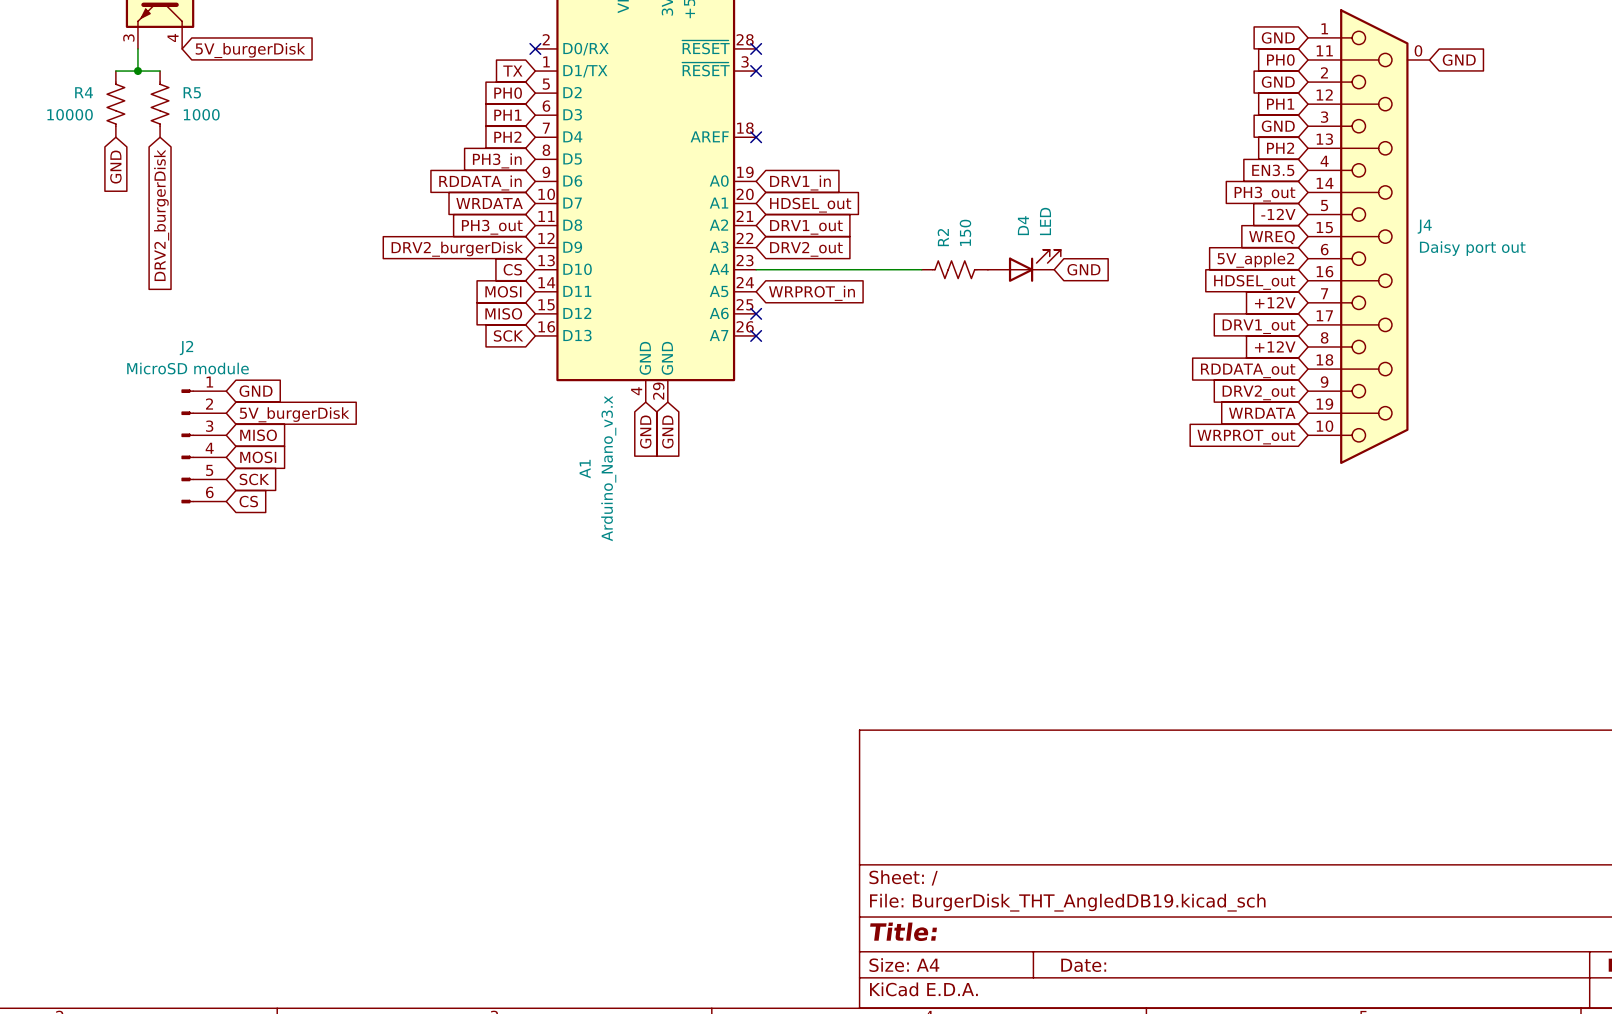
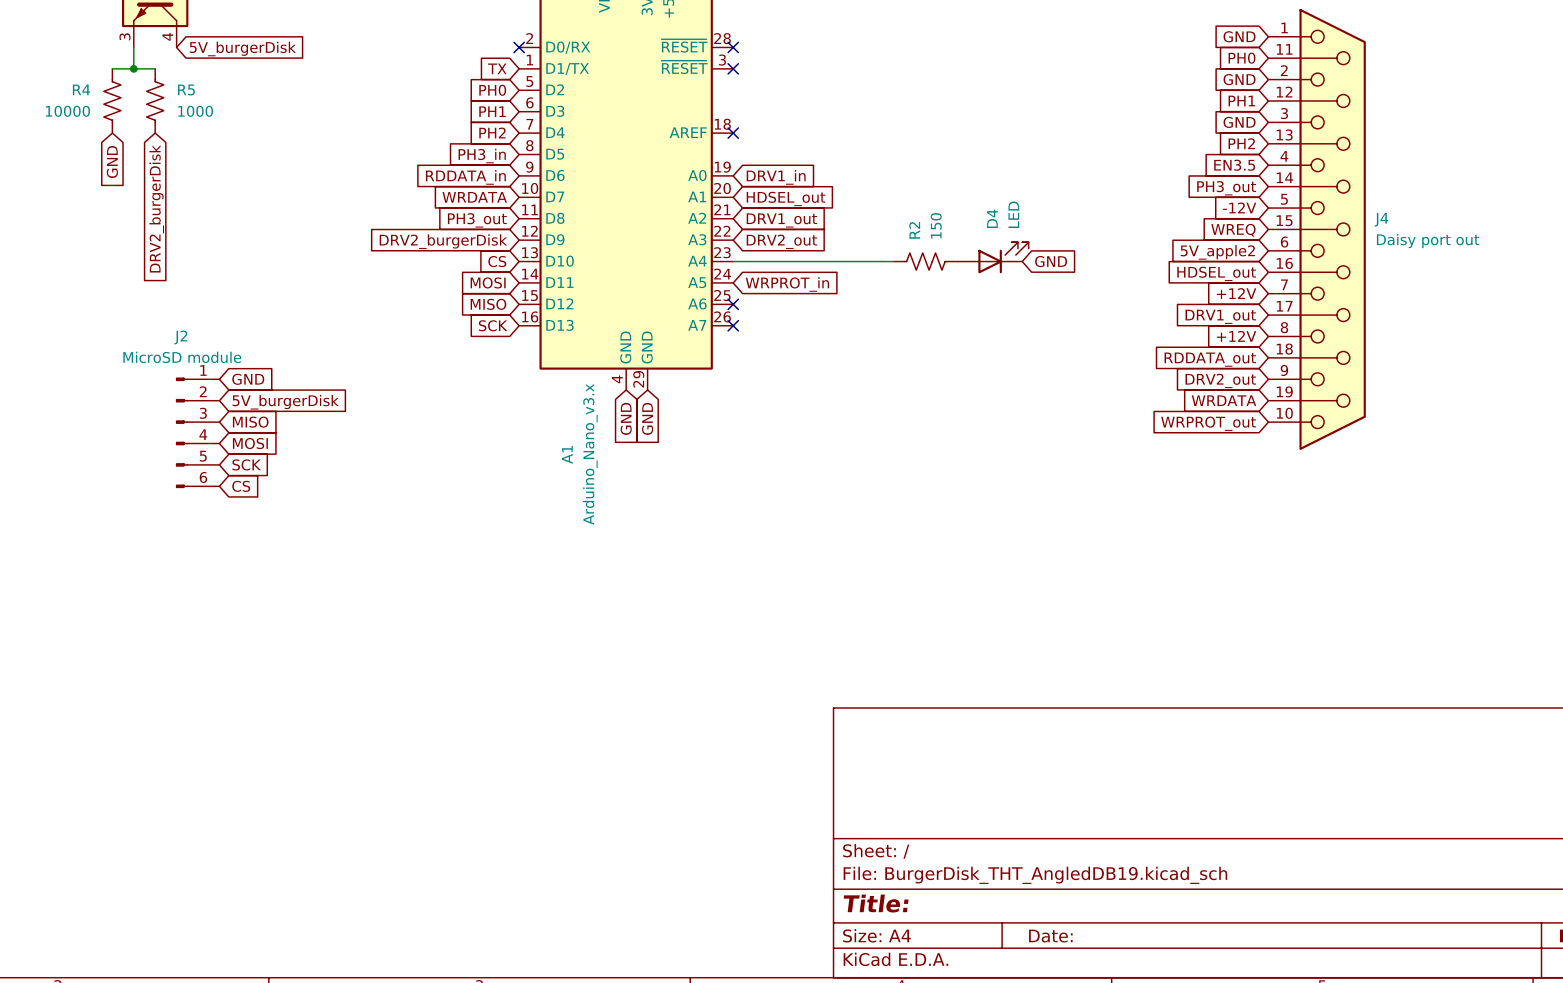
J4 symbol: [1308, 9, 1430, 465] -> [1268, 8, 1366, 450]
global label: GND (1459, 60) -> none

